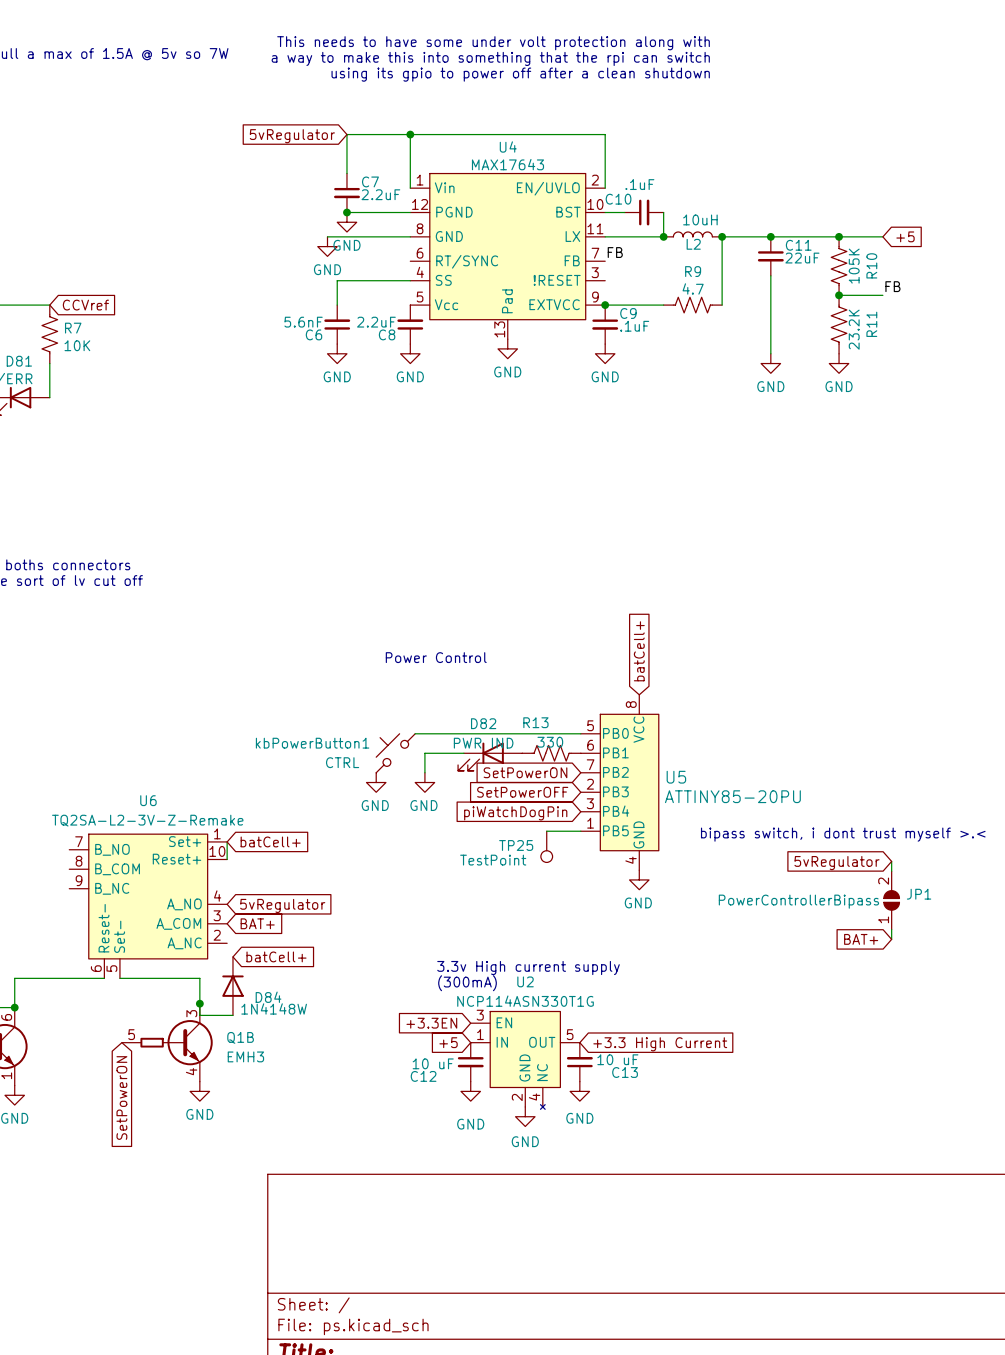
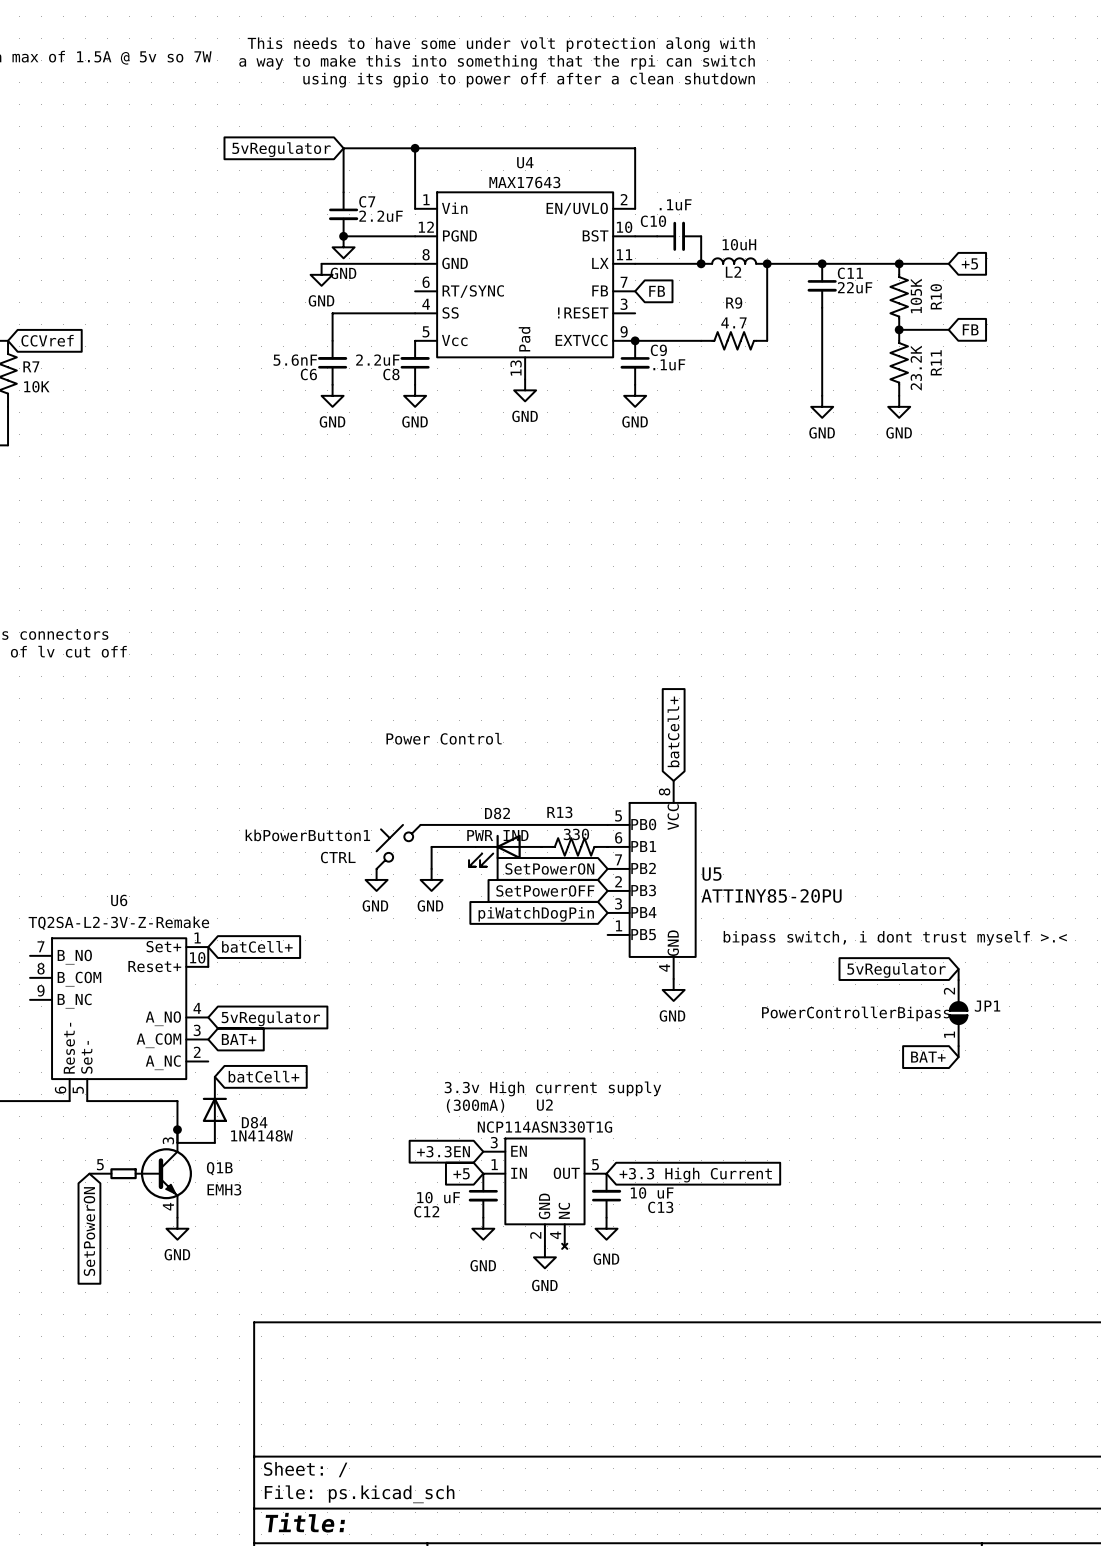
label: FB (615, 252) -> none
global label: none -> FB (657, 291)
label: FB (892, 286) -> none
global label: none -> FB (970, 329)
wire: (546, 831) (580, 831) -> none
TP25: TestPoint (546, 846) -> none

